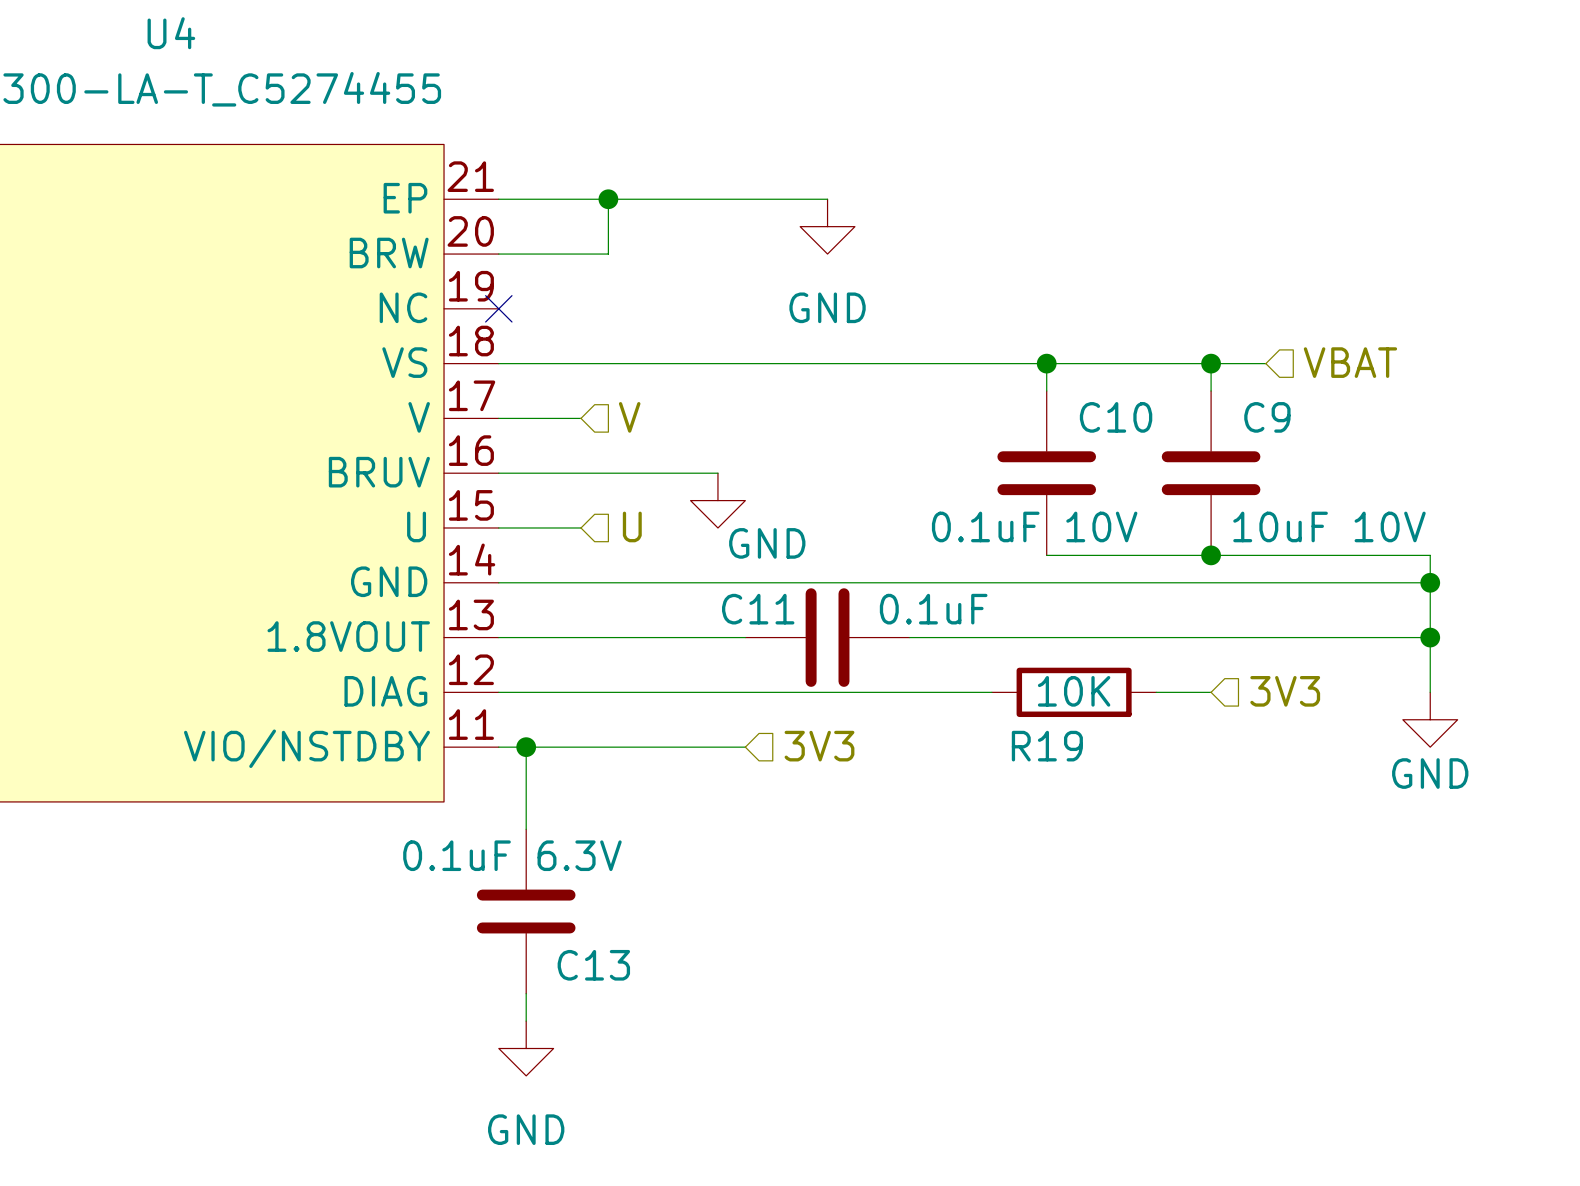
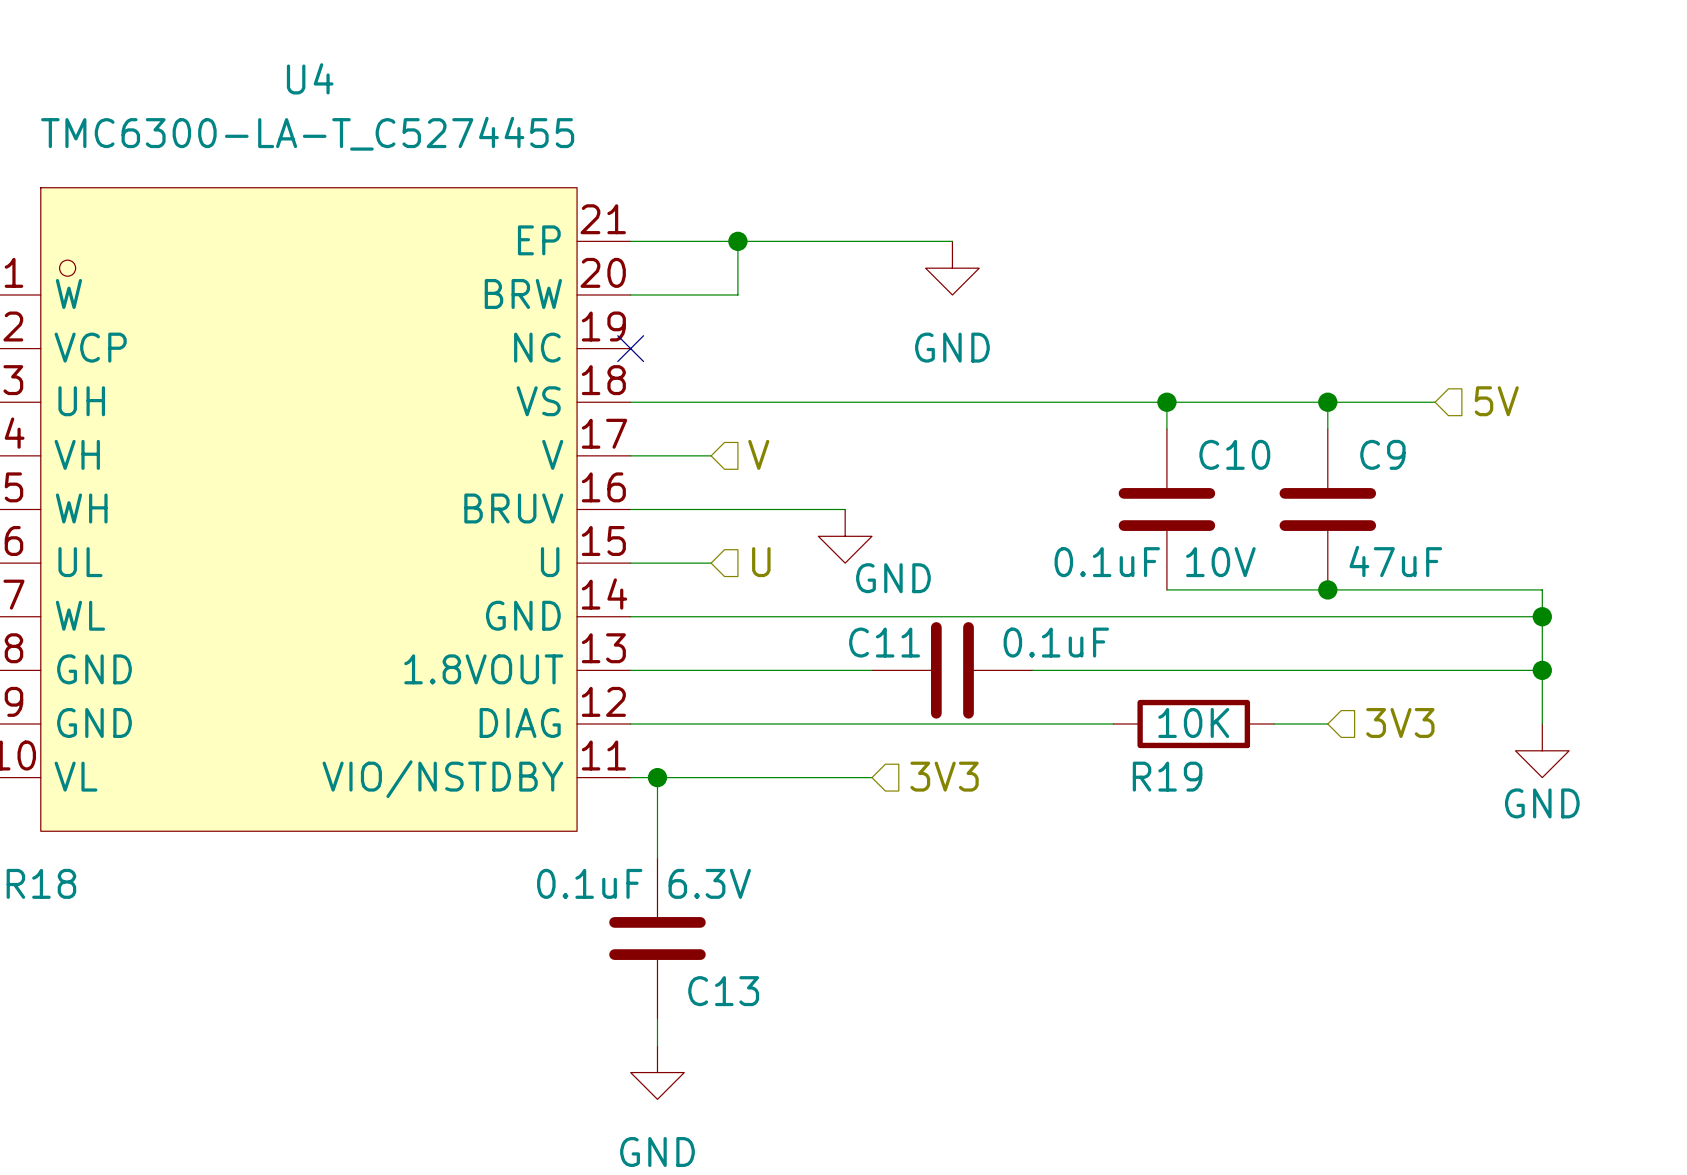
hierarchical label: VBAT (1350, 362) -> none
hierarchical label: none -> 5V (1496, 401)
wire: none -> (1381, 402) (1435, 402)
C9 value: 10uF 10V (1329, 526) -> 47uF (1395, 561)

